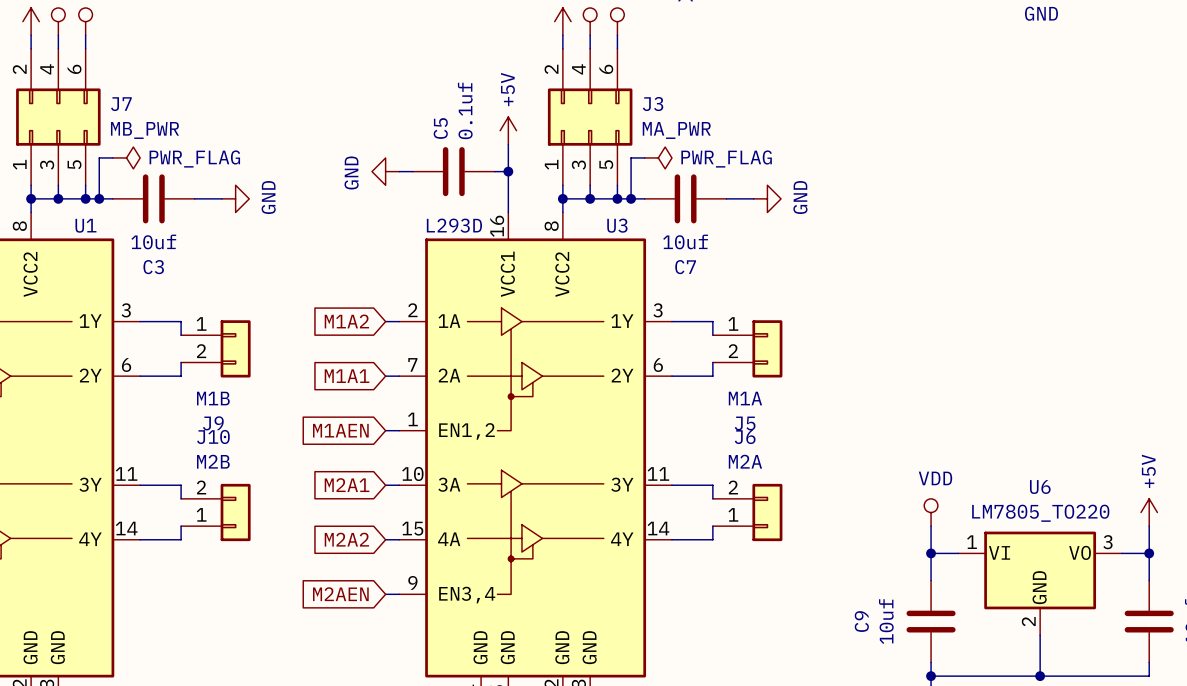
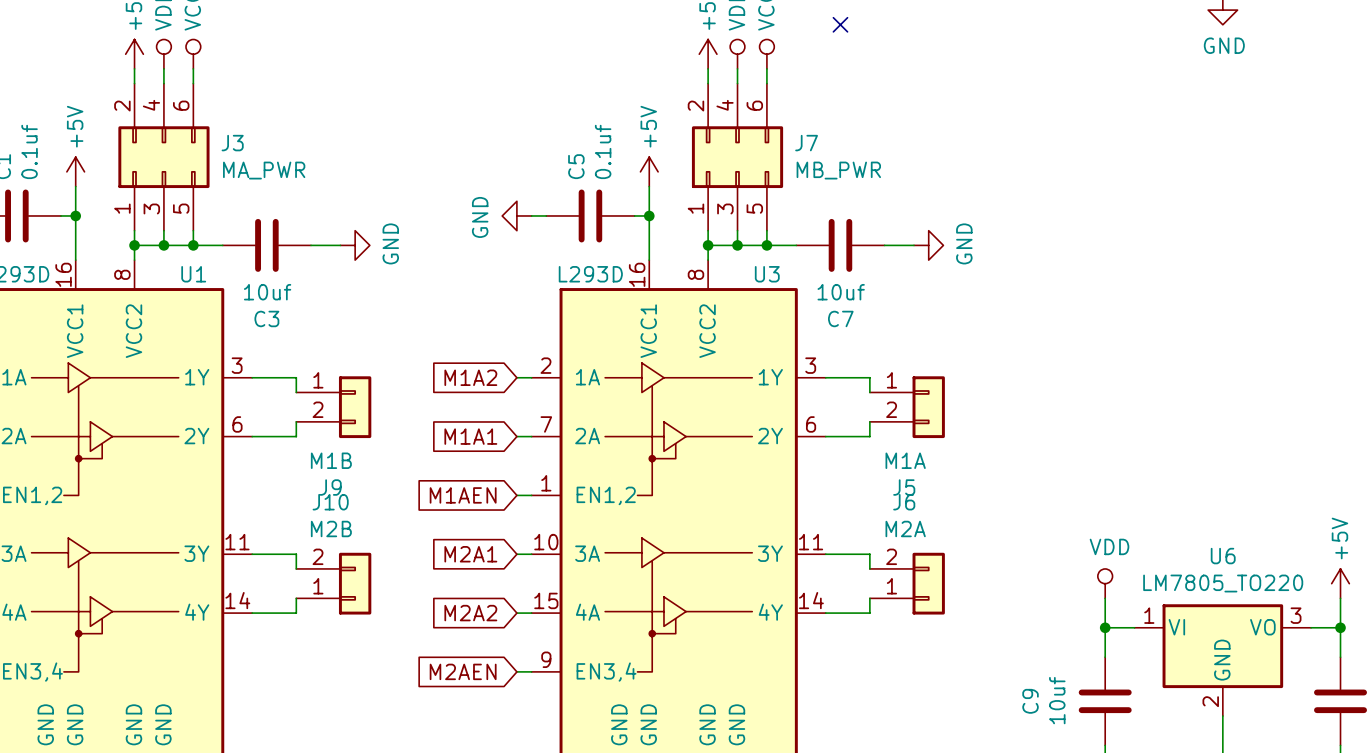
J7 name: J7 (121, 104) -> J3 (232, 143)
J3 name: J3 (653, 104) -> J7 (806, 143)
J7 value: MB_PWR (144, 130) -> MA_PWR (264, 170)
J3 value: MA_PWR (676, 130) -> MB_PWR (838, 170)
wire: (112, 157) (99, 157) (99, 198) -> none
power symbol: PWR_FLAG (126, 157) -> none
wire: (644, 157) (631, 157) (631, 198) -> none
power symbol: PWR_FLAG (658, 157) -> none
junction: (99, 198) -> none
junction: (631, 198) -> none

